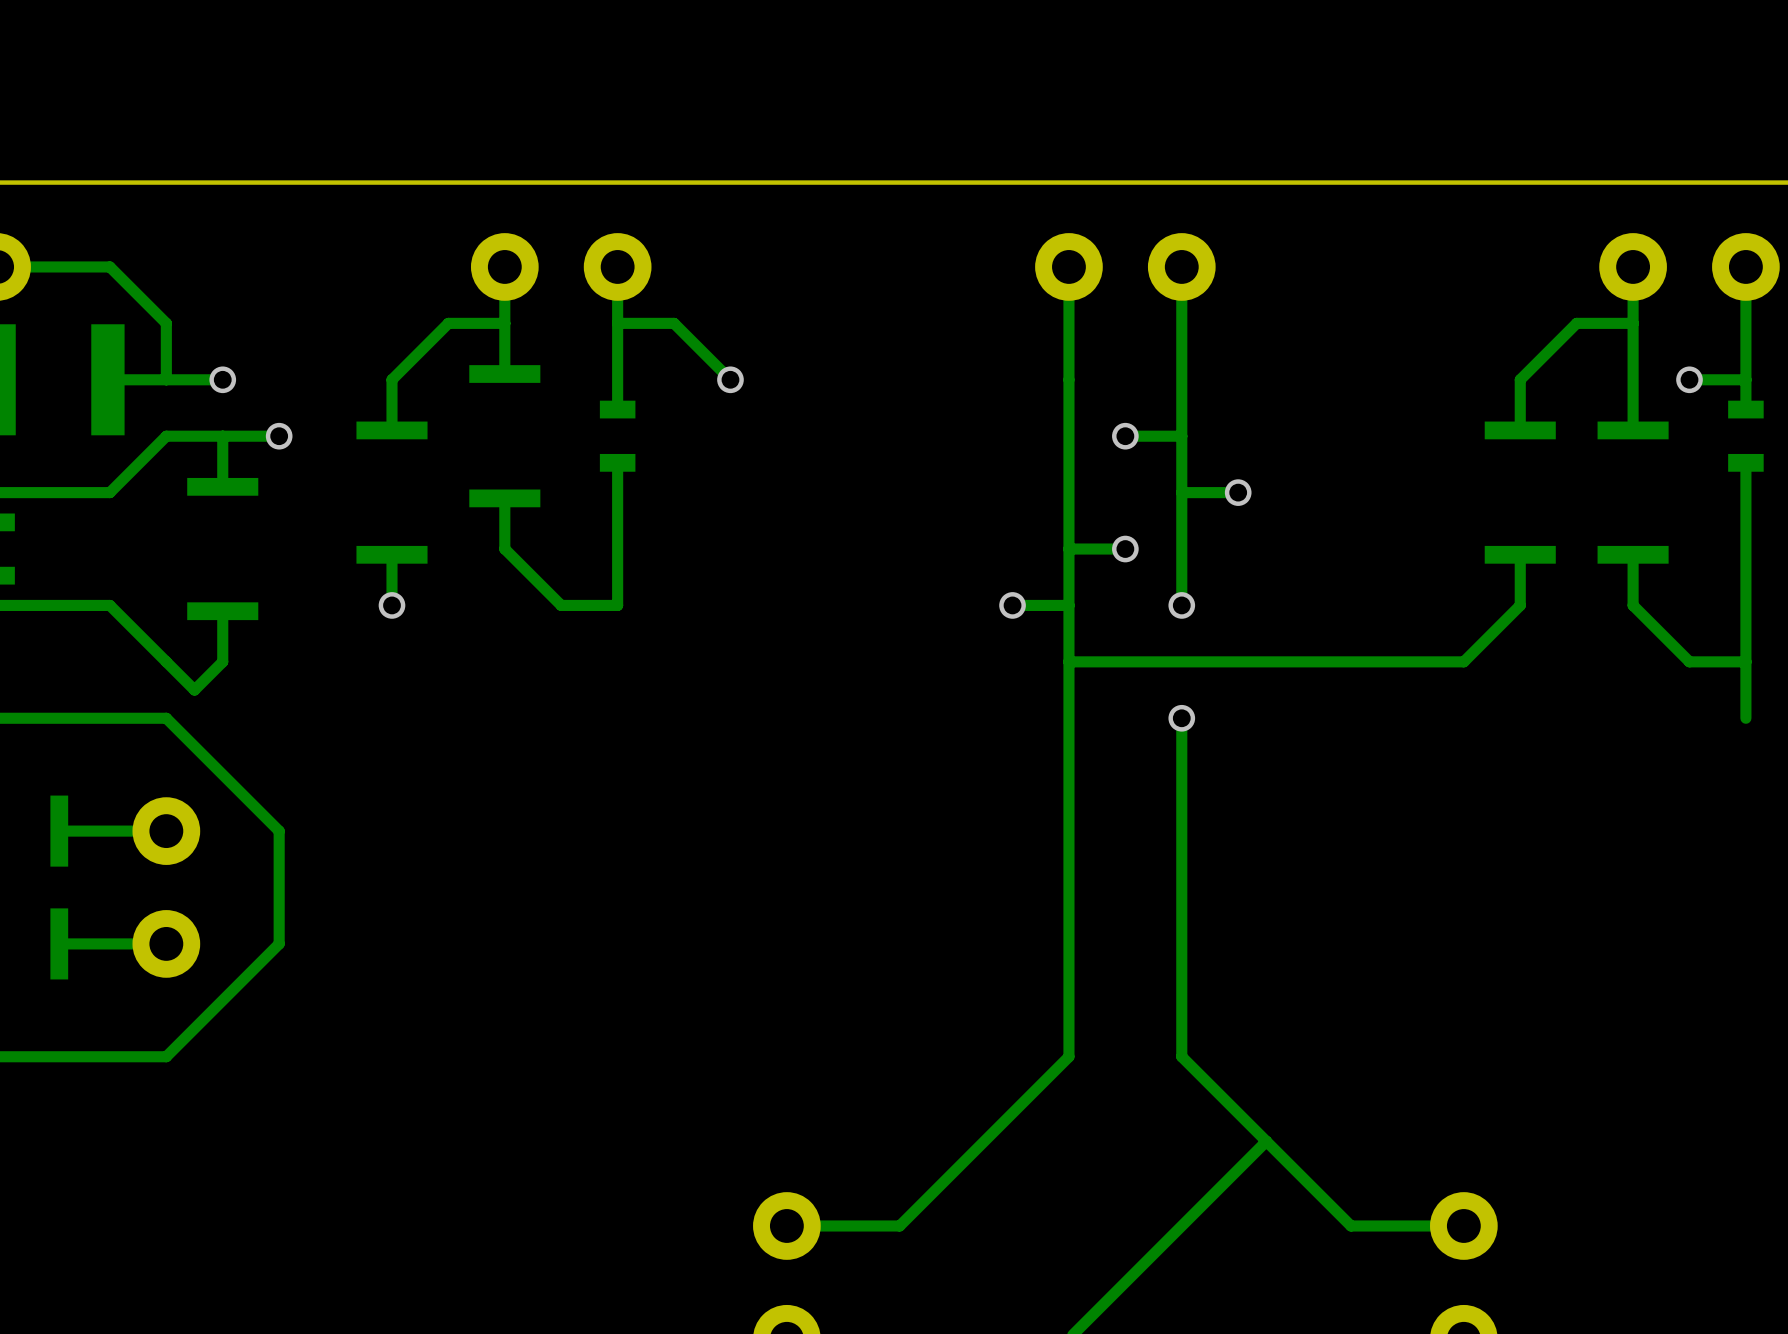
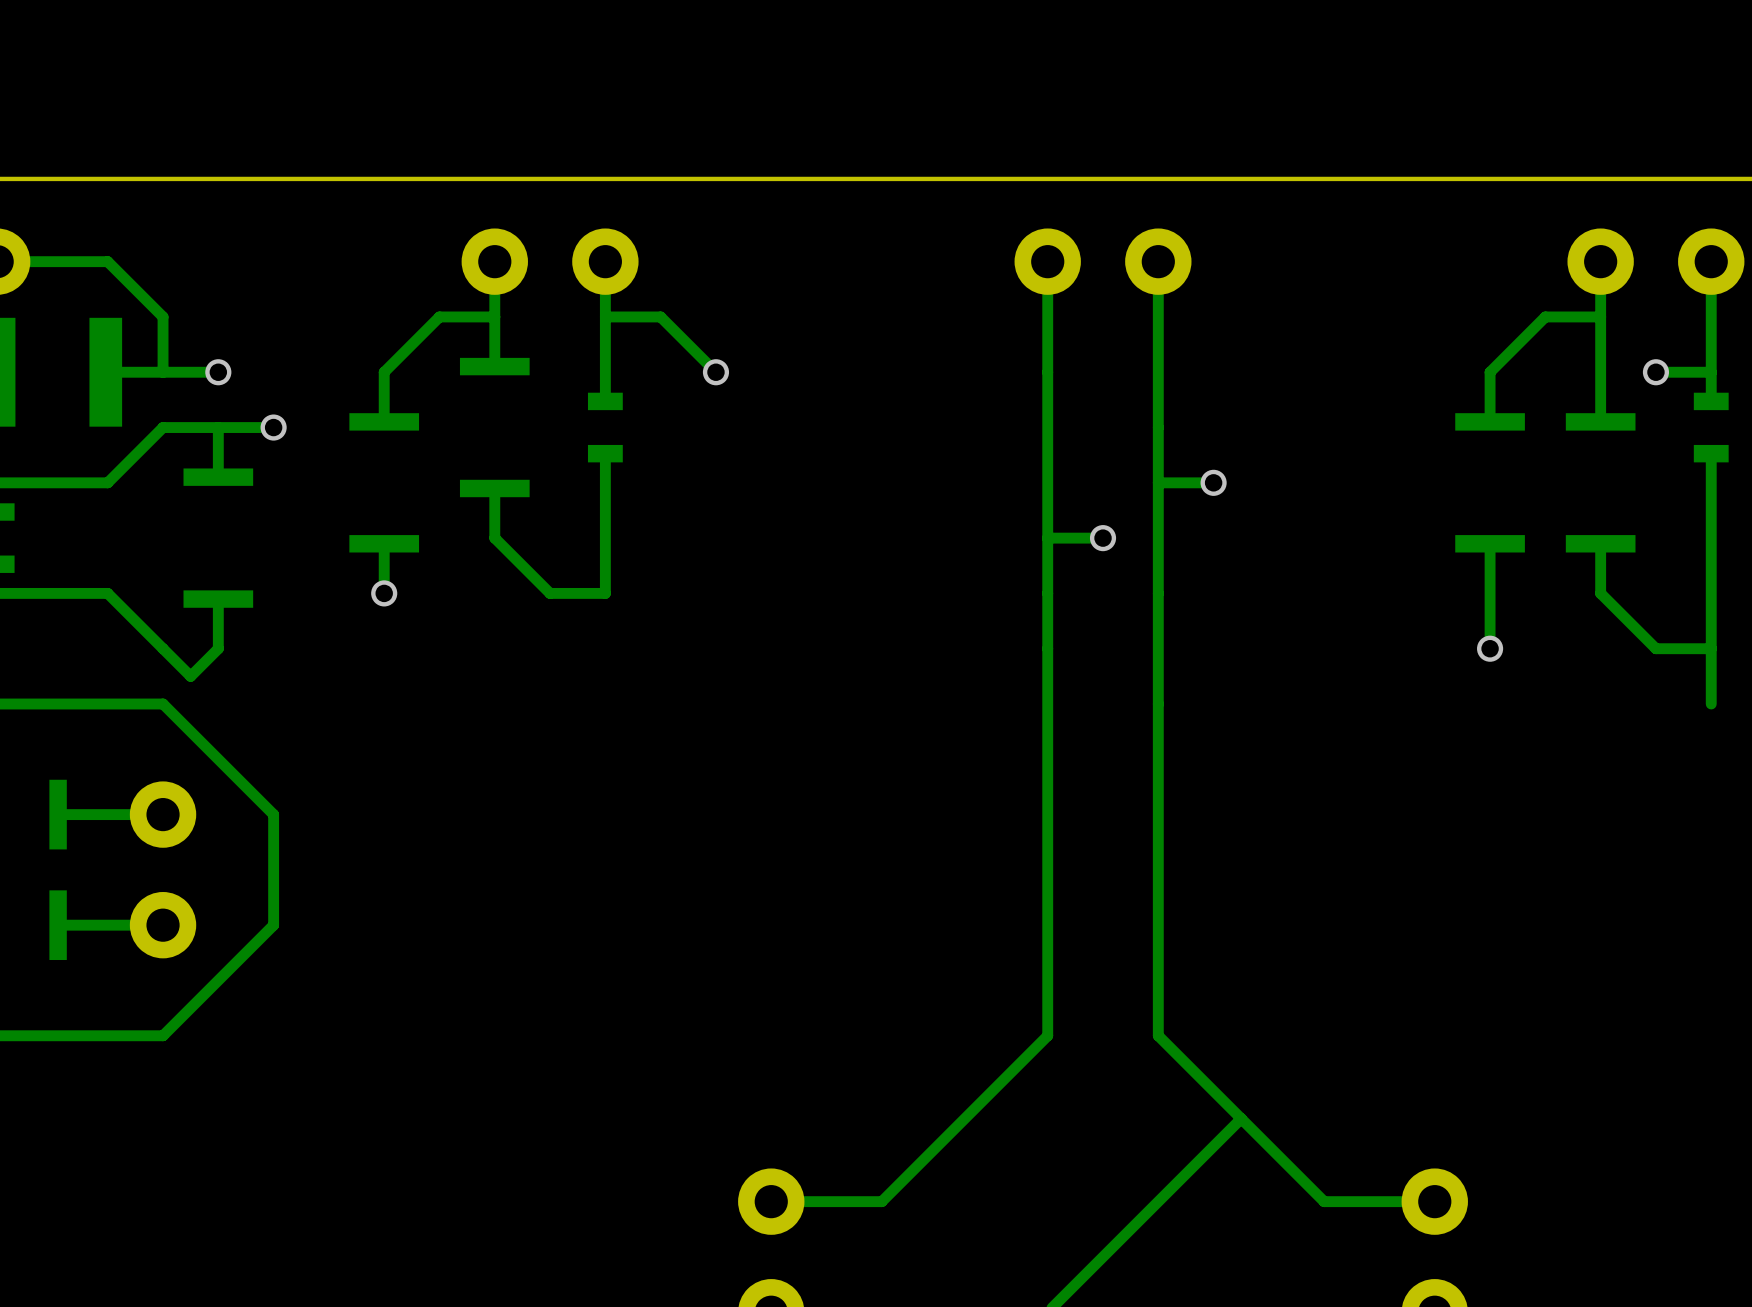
via: (1125, 436) -> none
track: (1181, 436) (1125, 436) -> none
via: (1012, 605) -> none
track: (1068, 605) (1012, 605) -> none
track: none -> (1158, 593) (1158, 704)
via: (1181, 605) -> none
track: (1520, 605) (1463, 661) (1068, 661) -> (1490, 593) (1490, 648)
via: none -> (1490, 648)
via: (1181, 718) -> none

